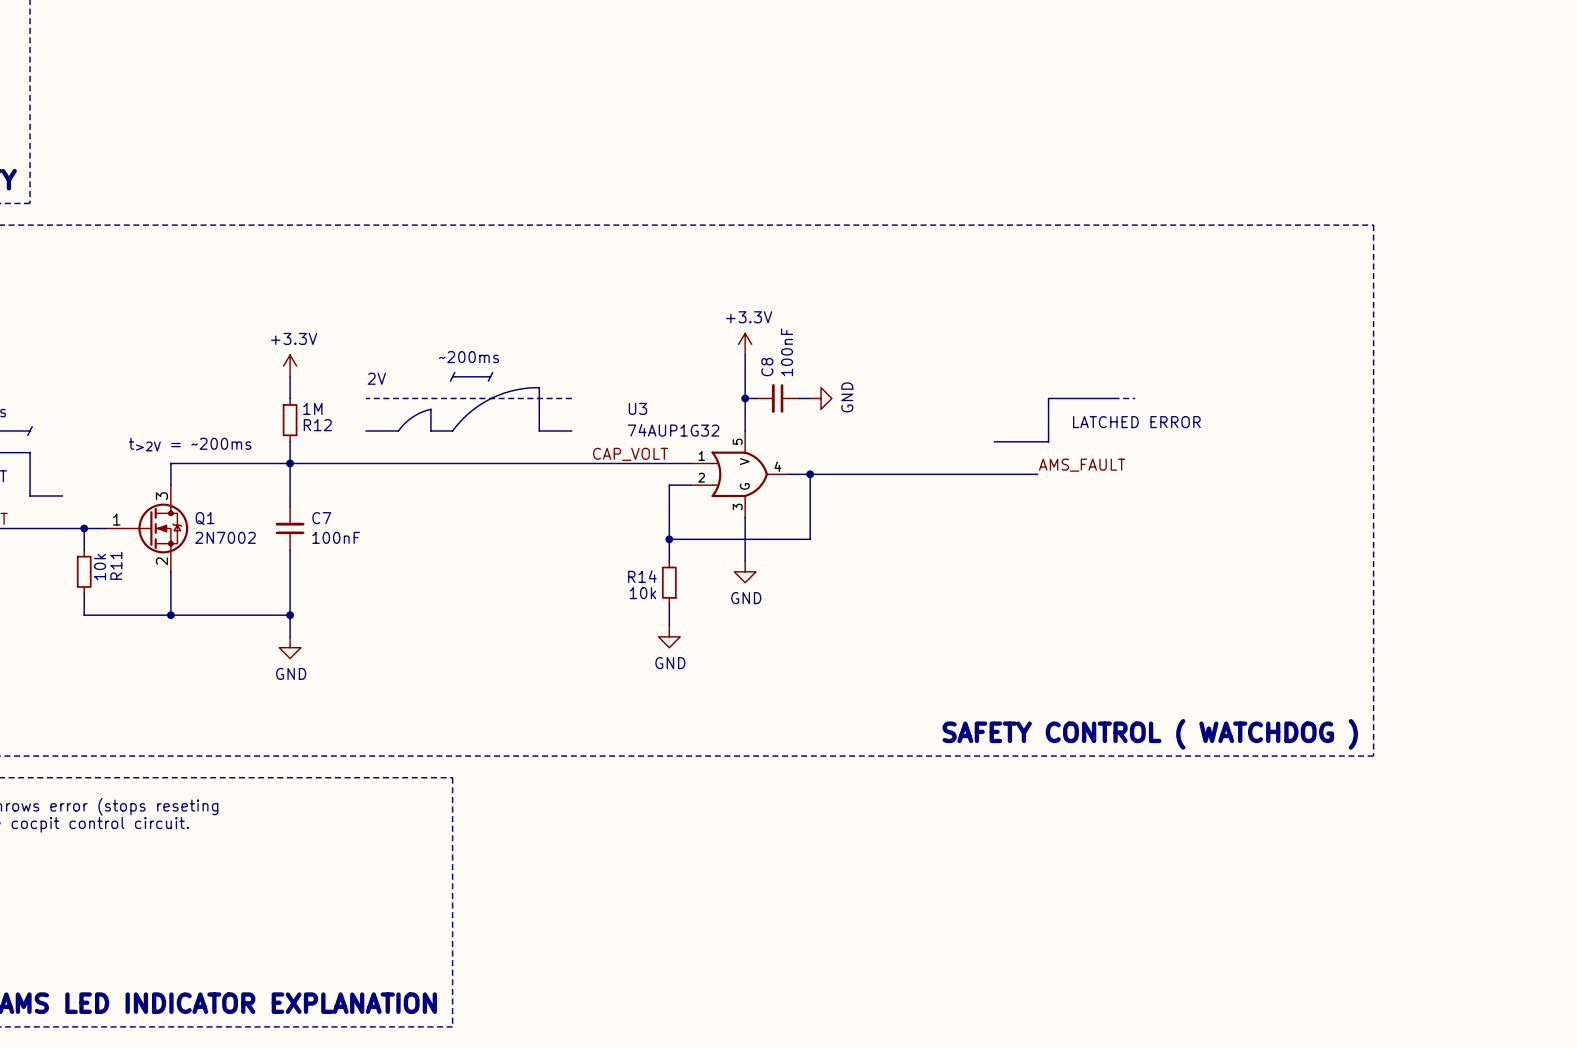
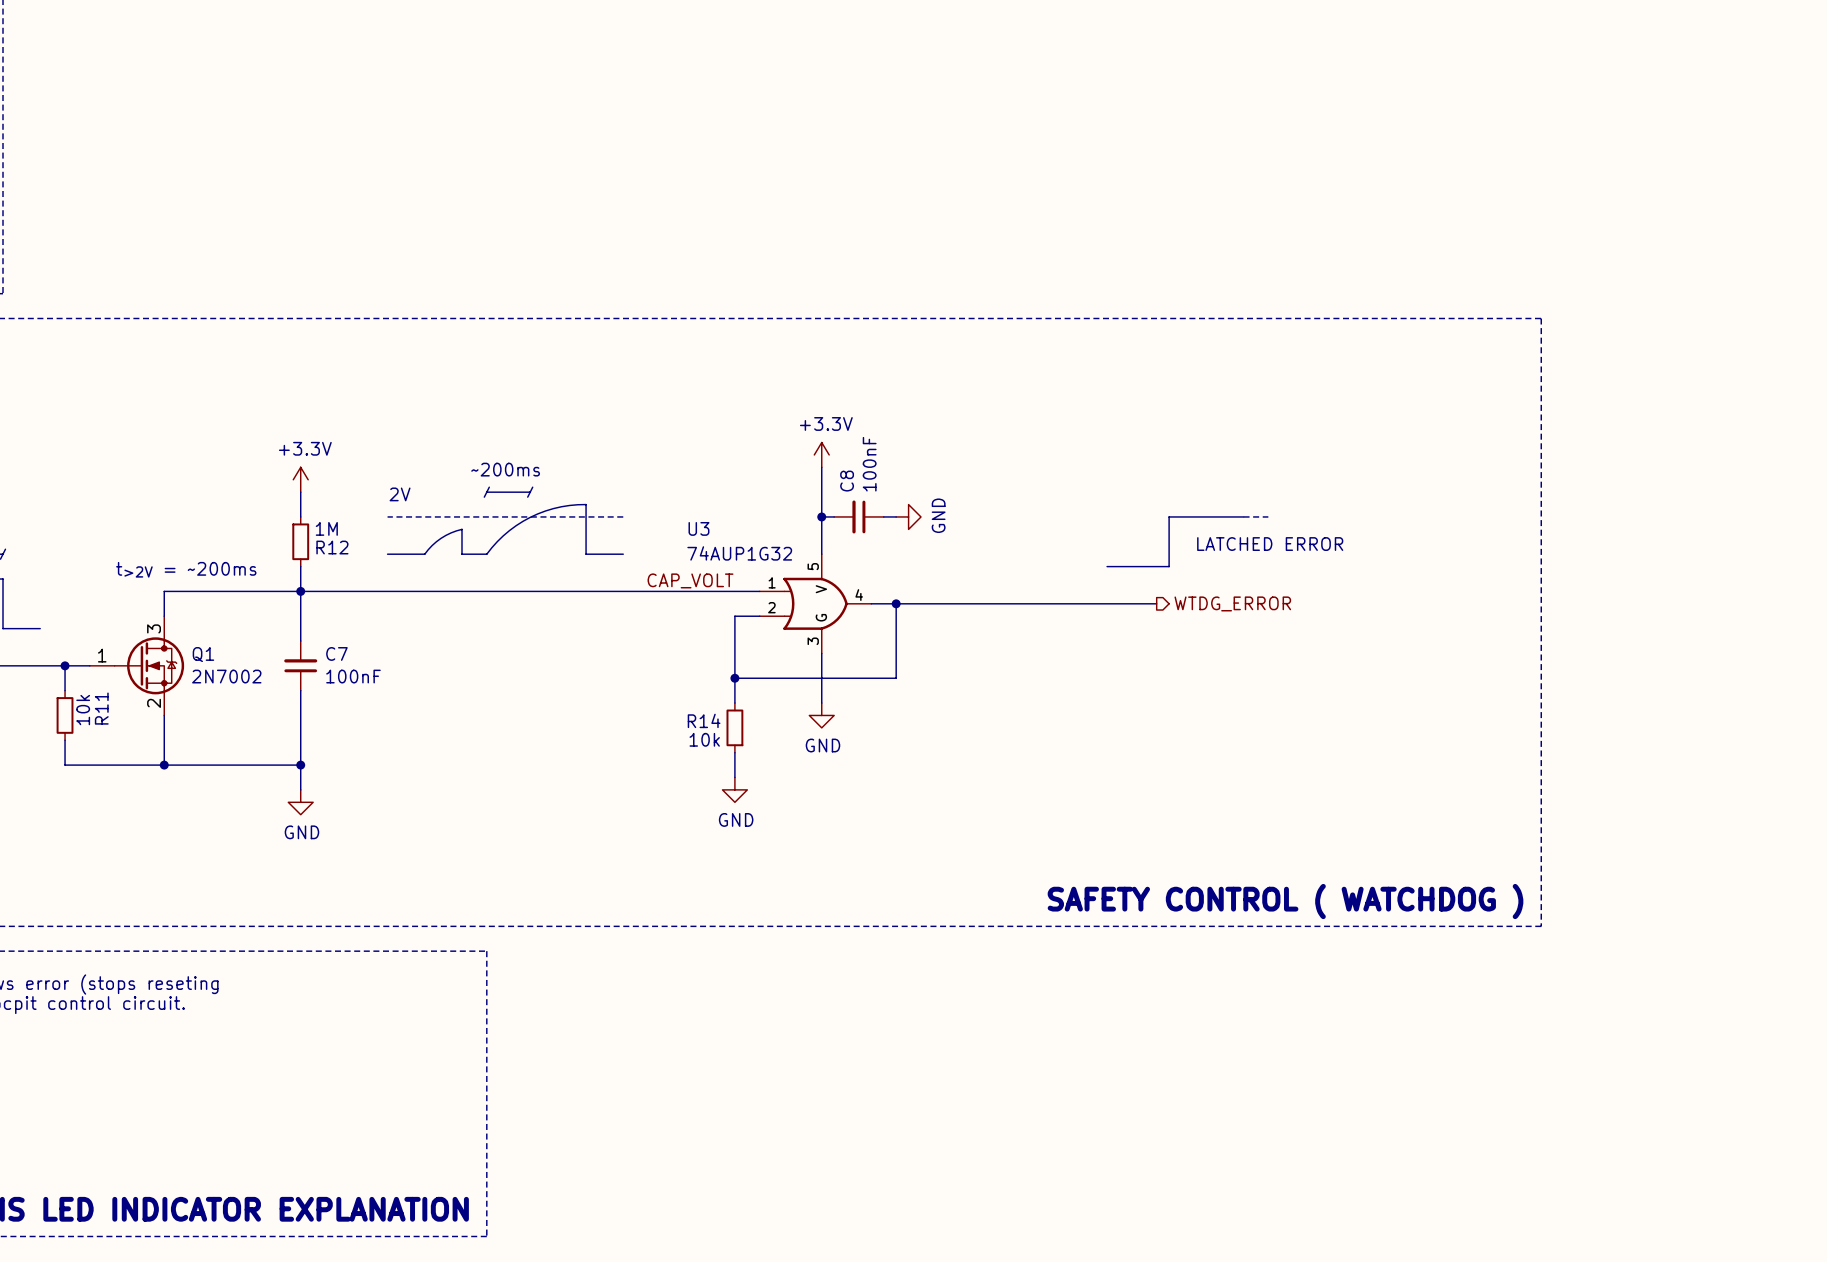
label: AMS_FAULT (1082, 465) -> none
hierarchical label: none -> WTDG_ERROR (1232, 603)

